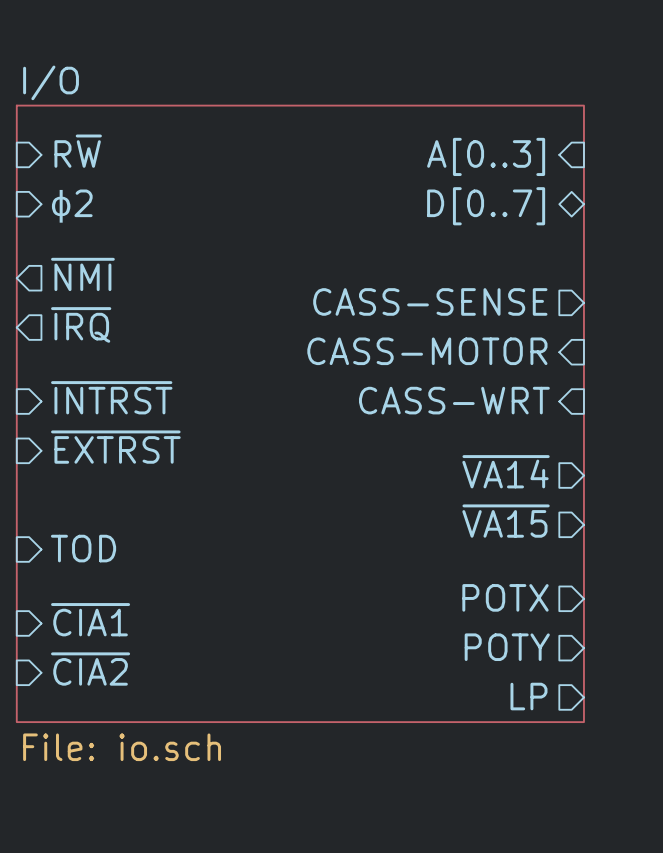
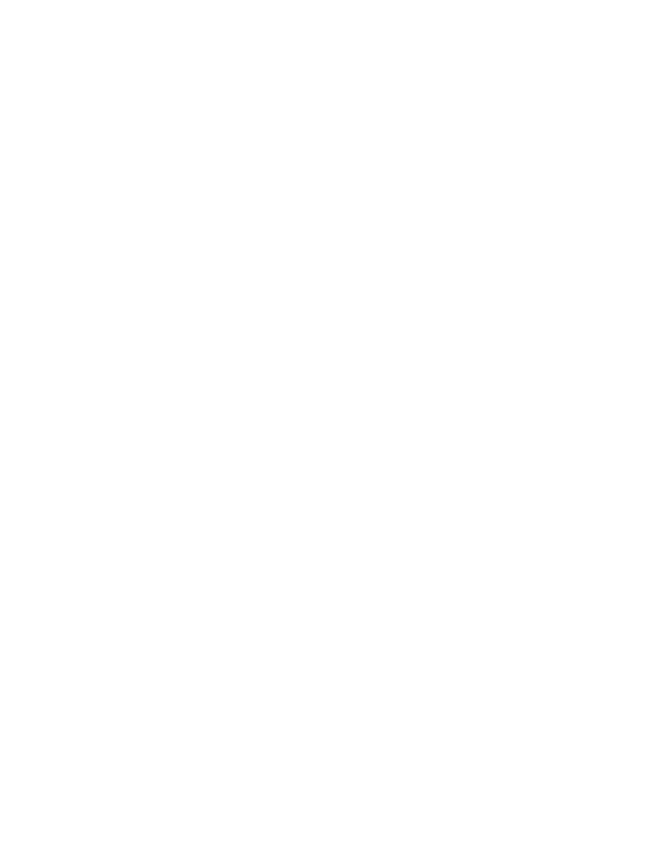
sheet pin: R~{W} (78, 151) -> none
sheet pin: A[0..3] (486, 156) -> none
sheet pin: ϕ2 (71, 206) -> none
sheet pin: D[0..7] (486, 206) -> none
sheet pin: ~{NMI} (82, 274) -> none
sheet pin: CASS-SENSE (430, 301) -> none
sheet pin: ~{IRQ} (81, 324) -> none
sheet pin: CASS-MOTOR (427, 351) -> none
sheet pin: ~{INTRST} (111, 397) -> none
sheet pin: CASS-WRT (454, 400) -> none
sheet I/O: File: io.sch (300, 413) -> none
sheet pin: ~{EXTRST} (115, 447) -> none
sheet pin: ~{VA14} (506, 471) -> none
sheet pin: ~{VA15} (506, 521) -> none
sheet pin: TOD (83, 548) -> none
sheet pin: POTX (505, 597) -> none
sheet pin: ~{CIA1} (90, 619) -> none
sheet pin: POTY (507, 647) -> none
sheet pin: ~{CIA2} (90, 669) -> none
sheet pin: LP (528, 696) -> none

